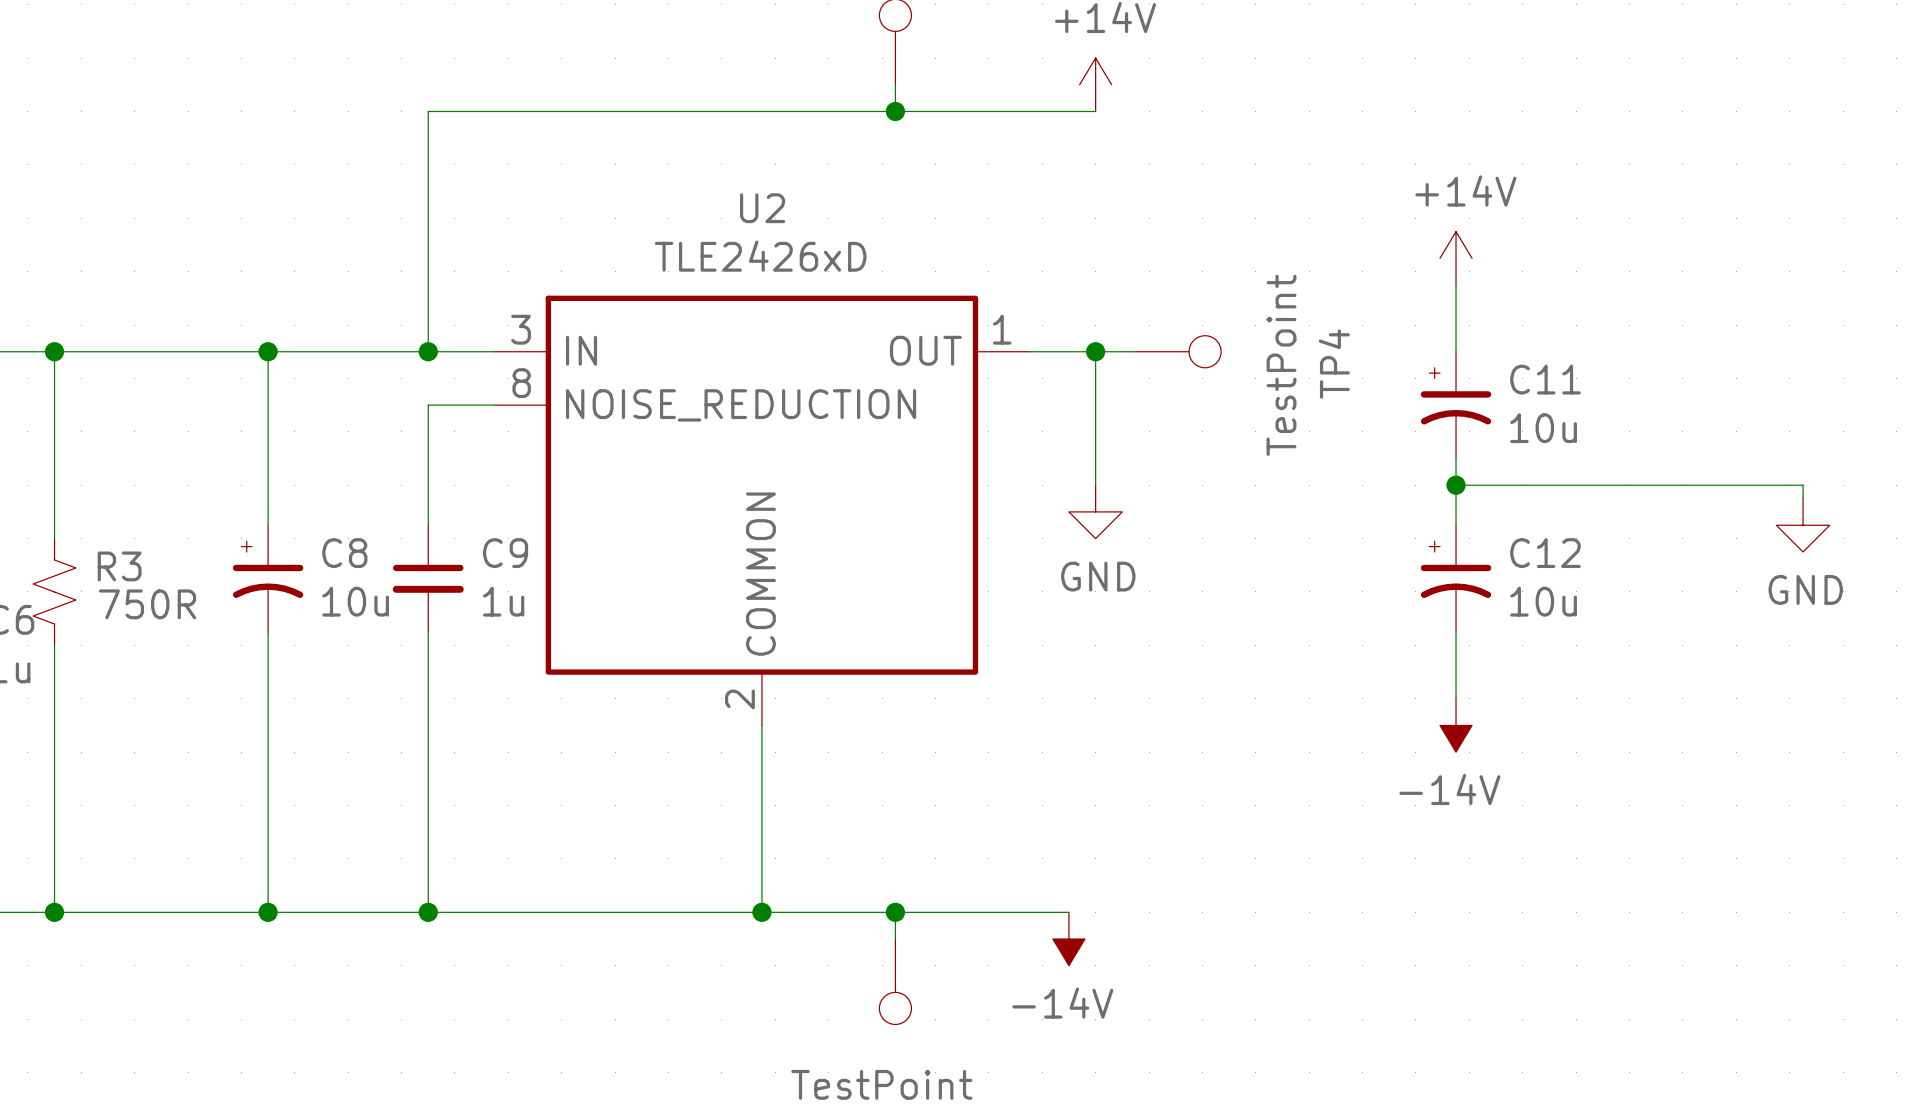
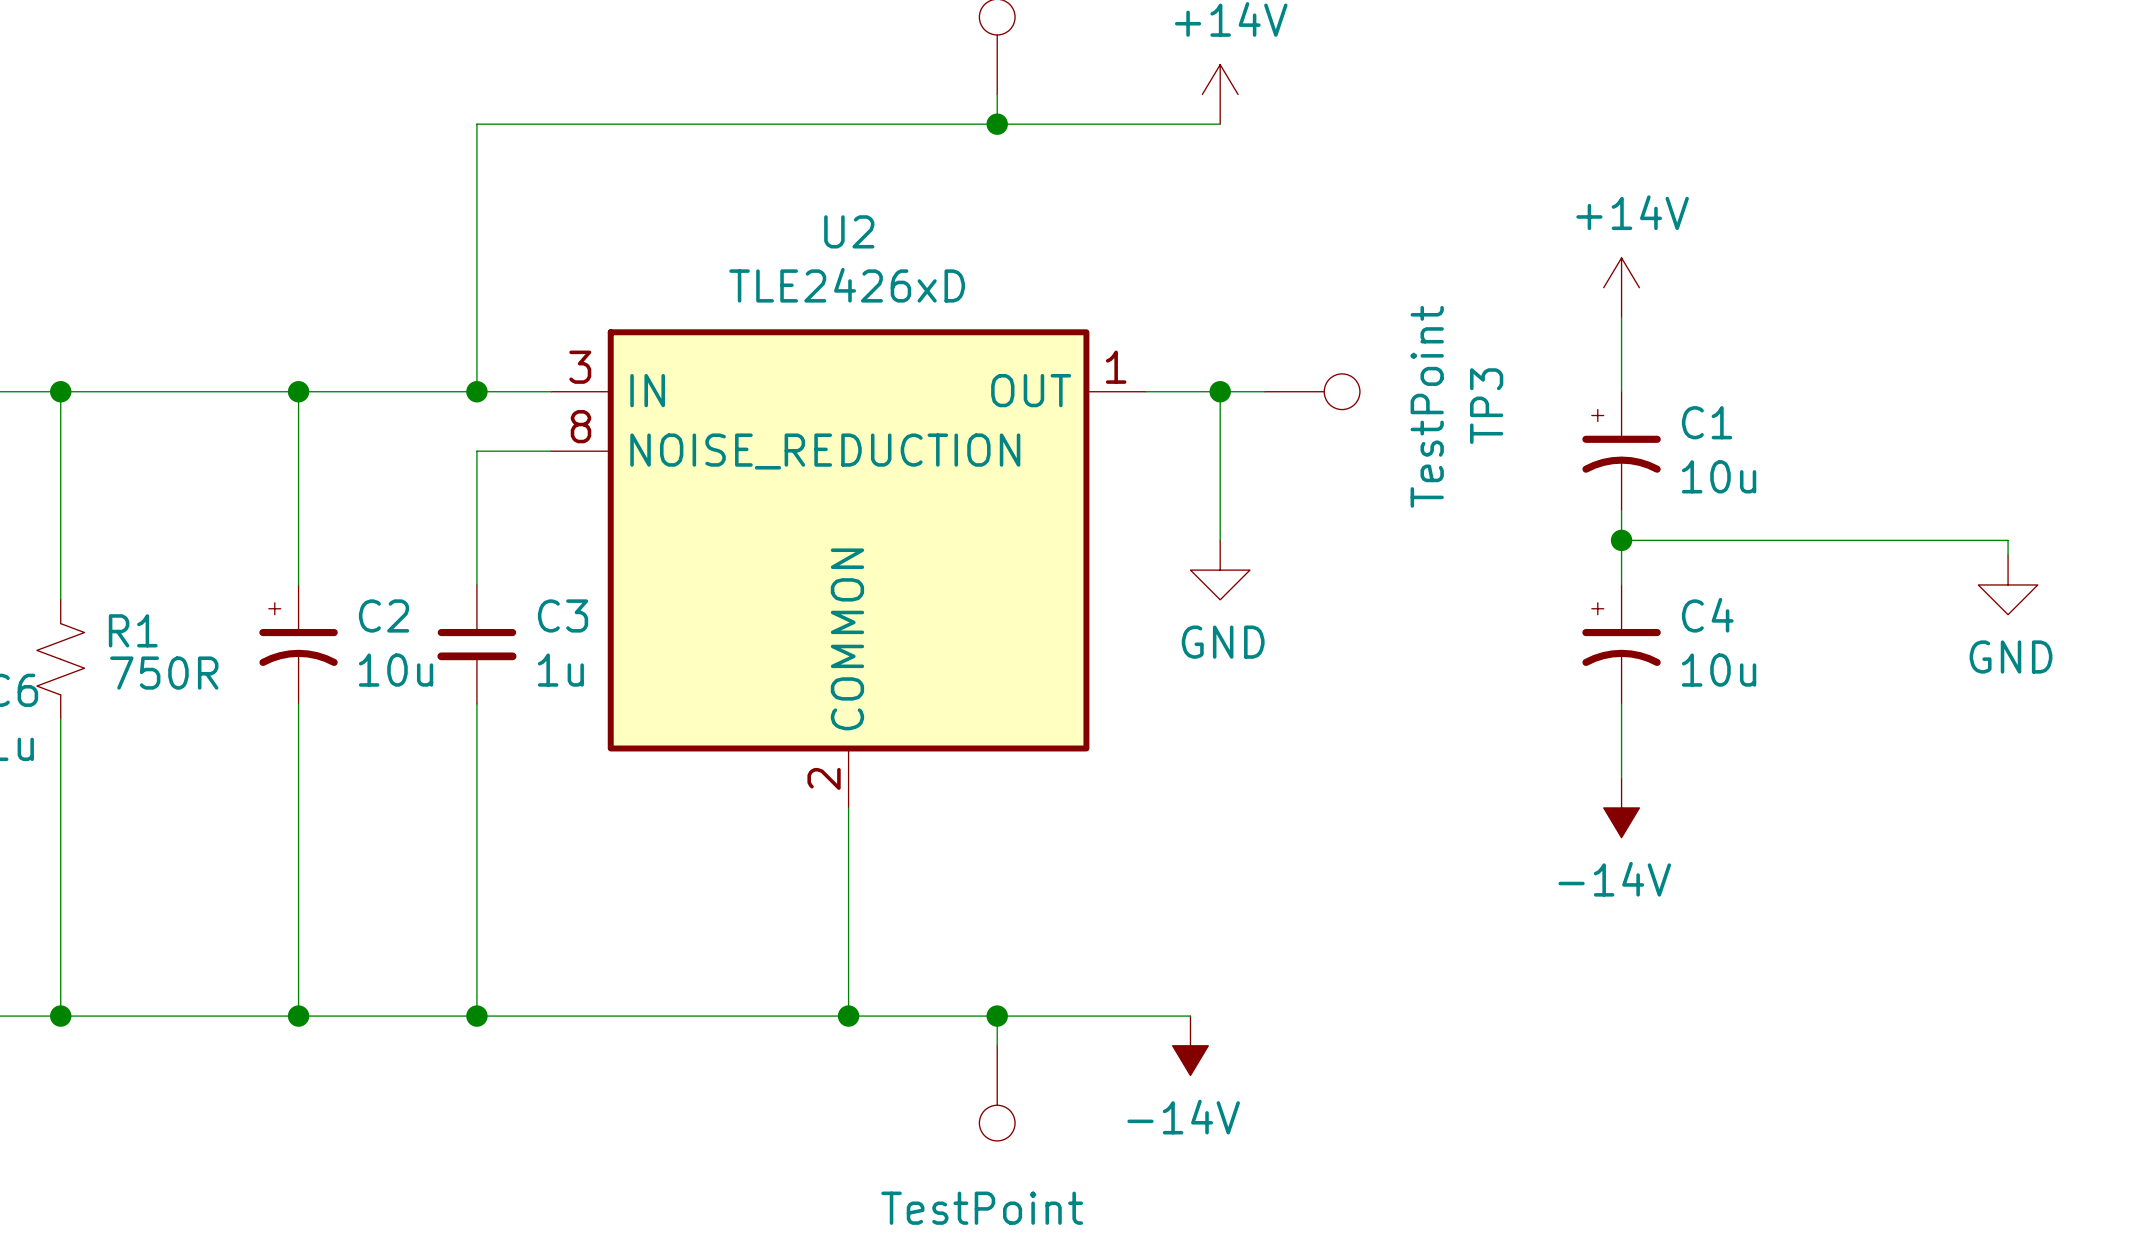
TP4 name: TP4 (1334, 364) -> TP3 (1486, 406)
C11 name: C11 (1545, 379) -> C1 (1707, 422)
C8 name: C8 (344, 553) -> C2 (384, 615)
C9 name: C9 (505, 553) -> C3 (563, 615)
C12 name: C12 (1545, 553) -> C4 (1707, 615)
R3 name: R3 (119, 566) -> R1 (133, 630)

